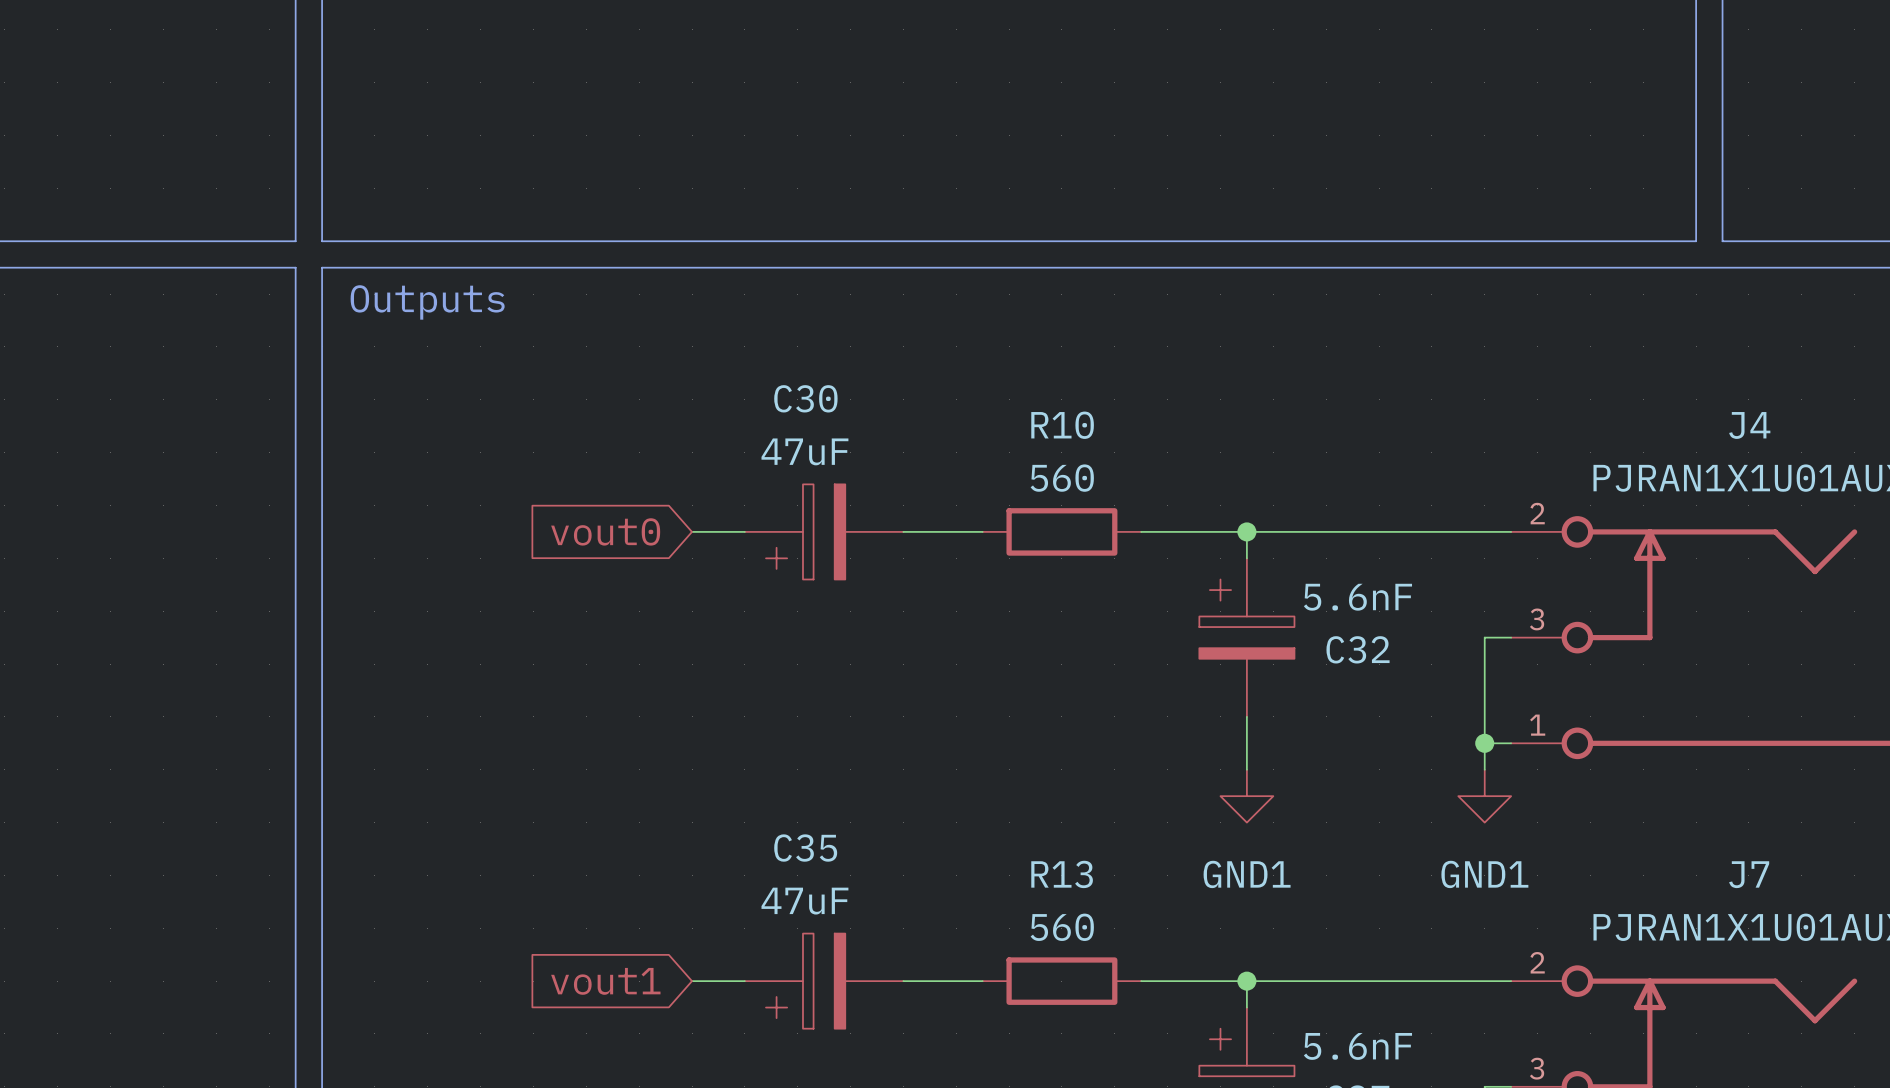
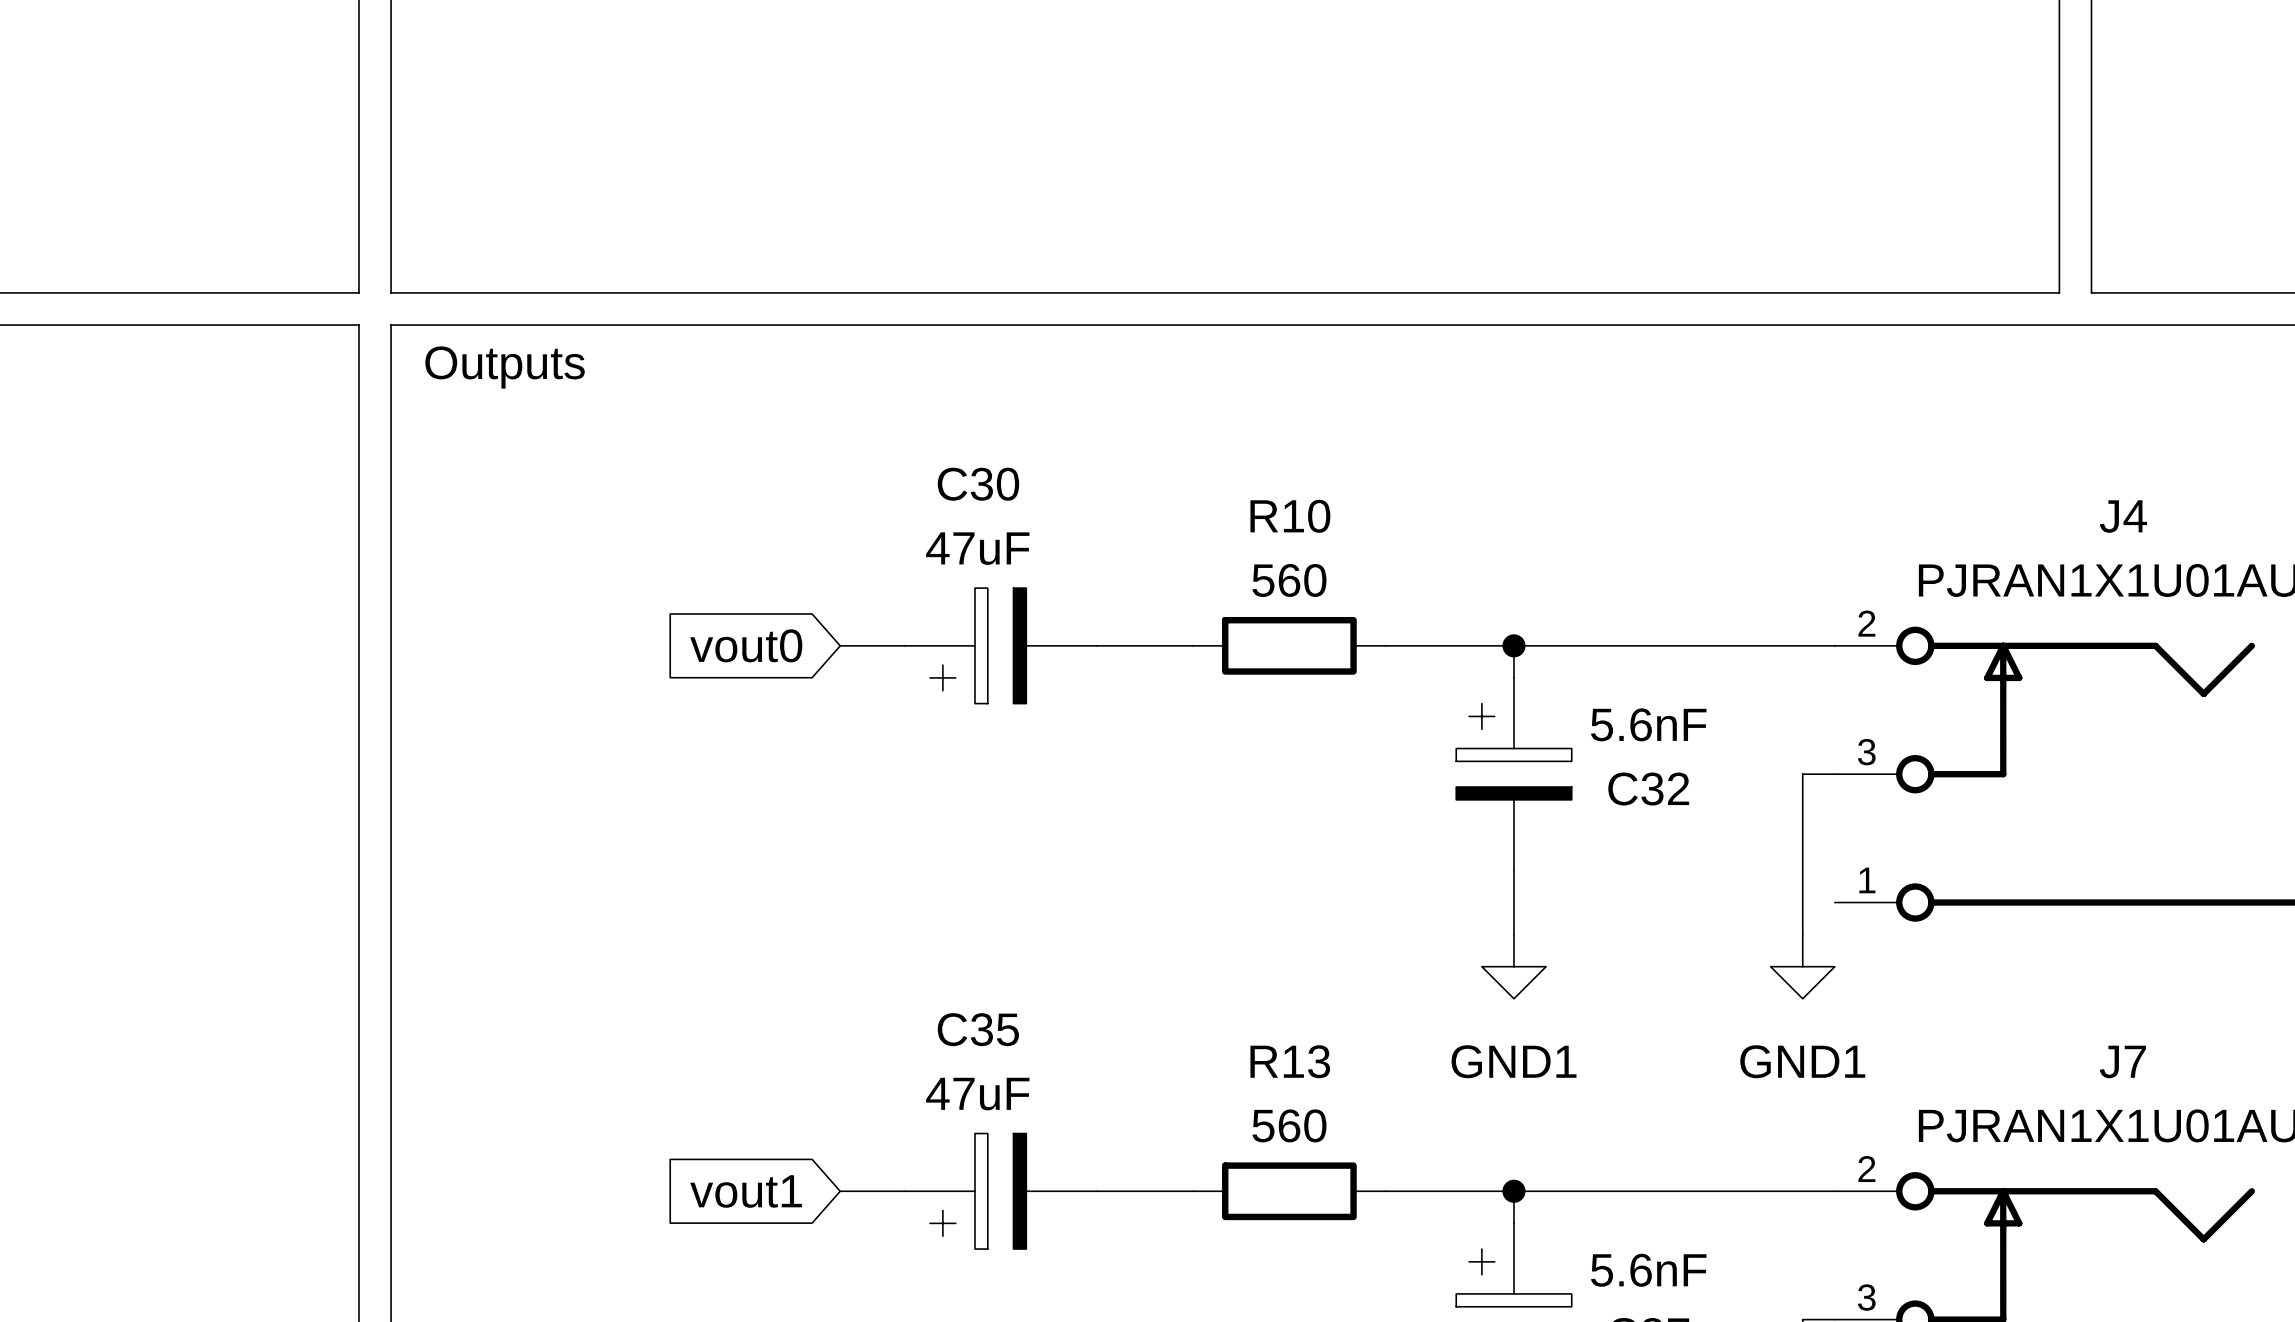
wire: (1484, 743) (1511, 743) -> none
junction: (1484, 743) -> none

